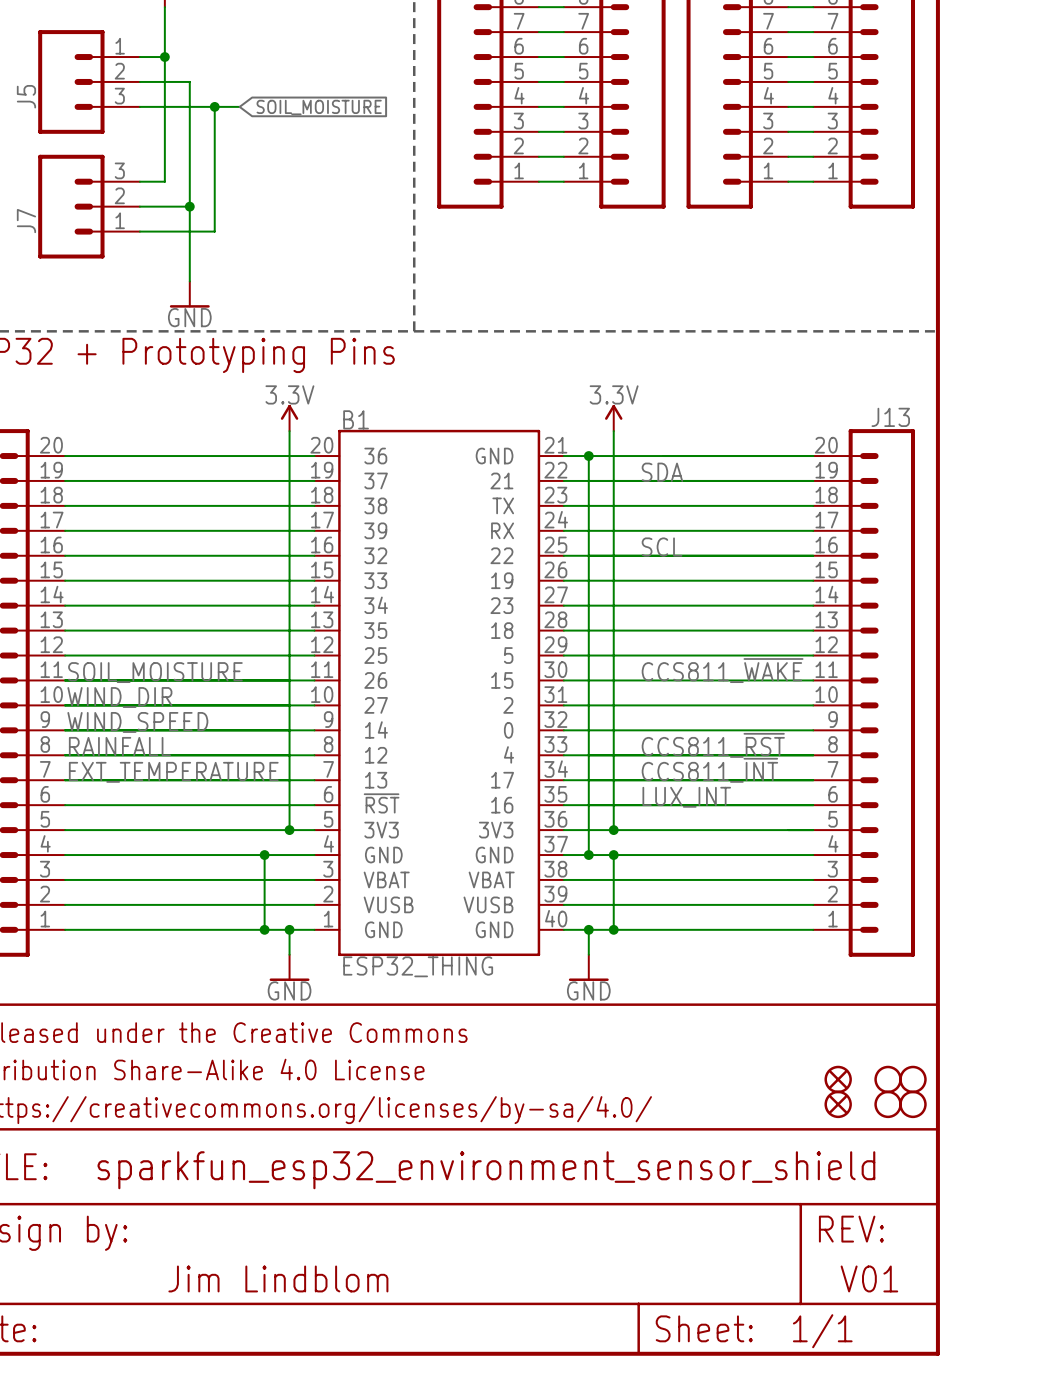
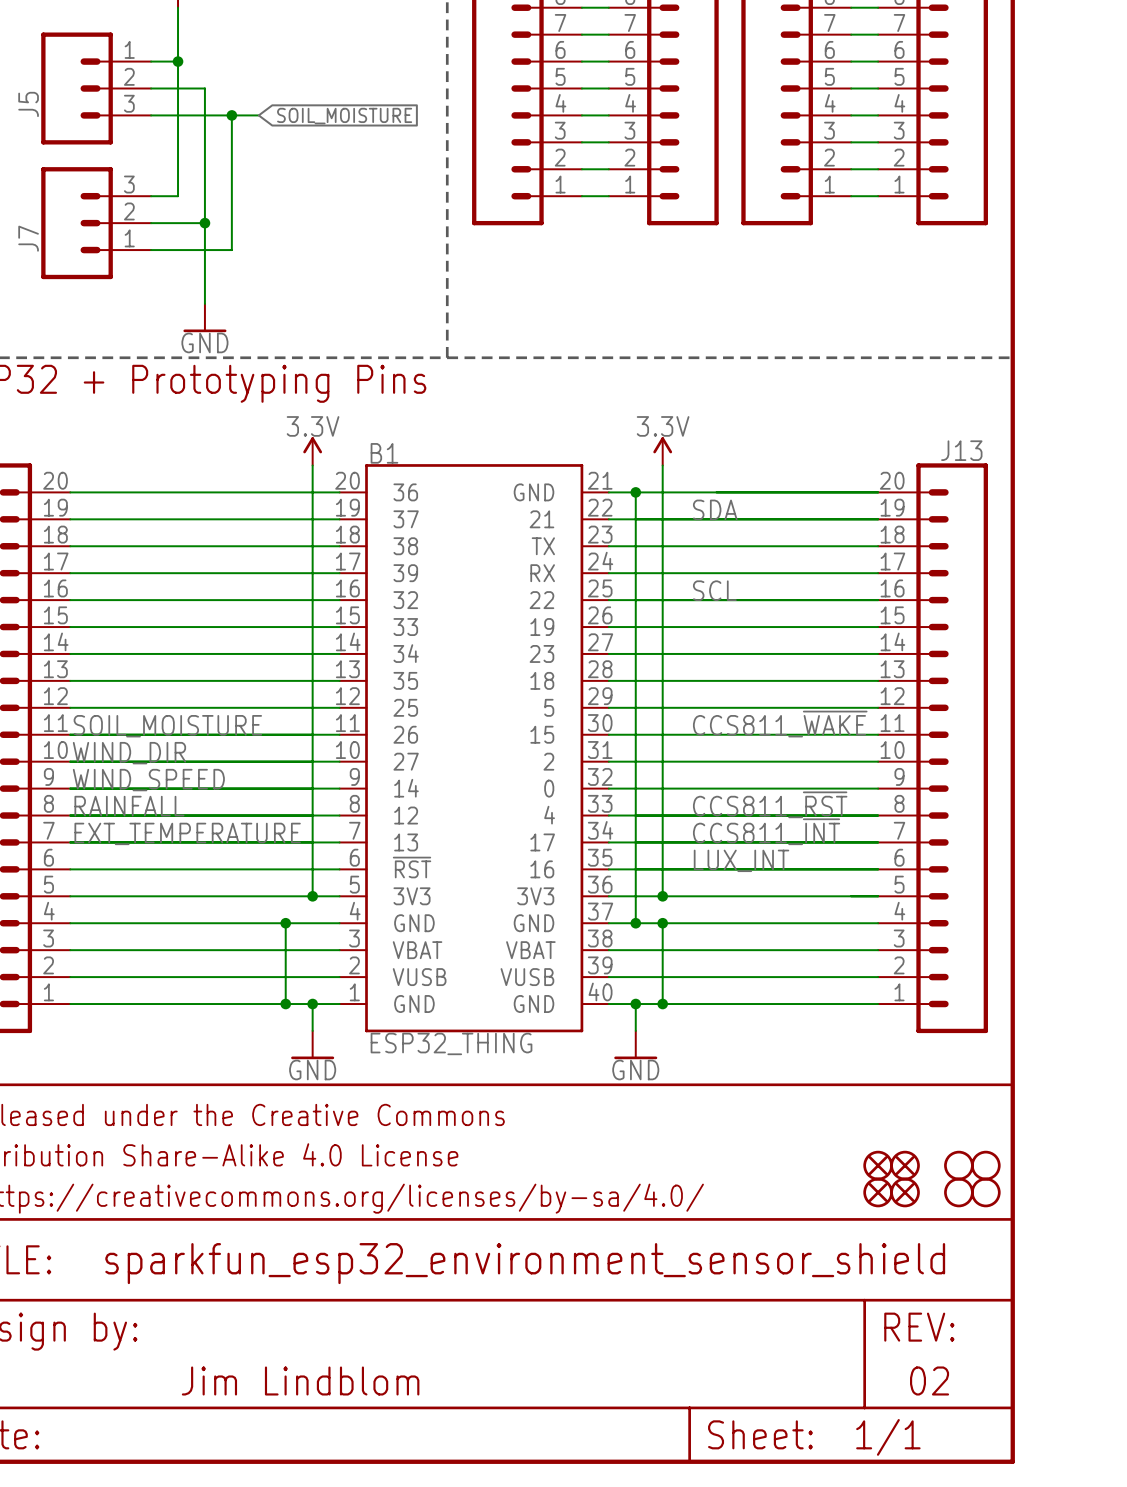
part: none -> (878, 1165)
part: none -> (878, 1192)
text: V01 (869, 1278) -> 02 (929, 1380)

